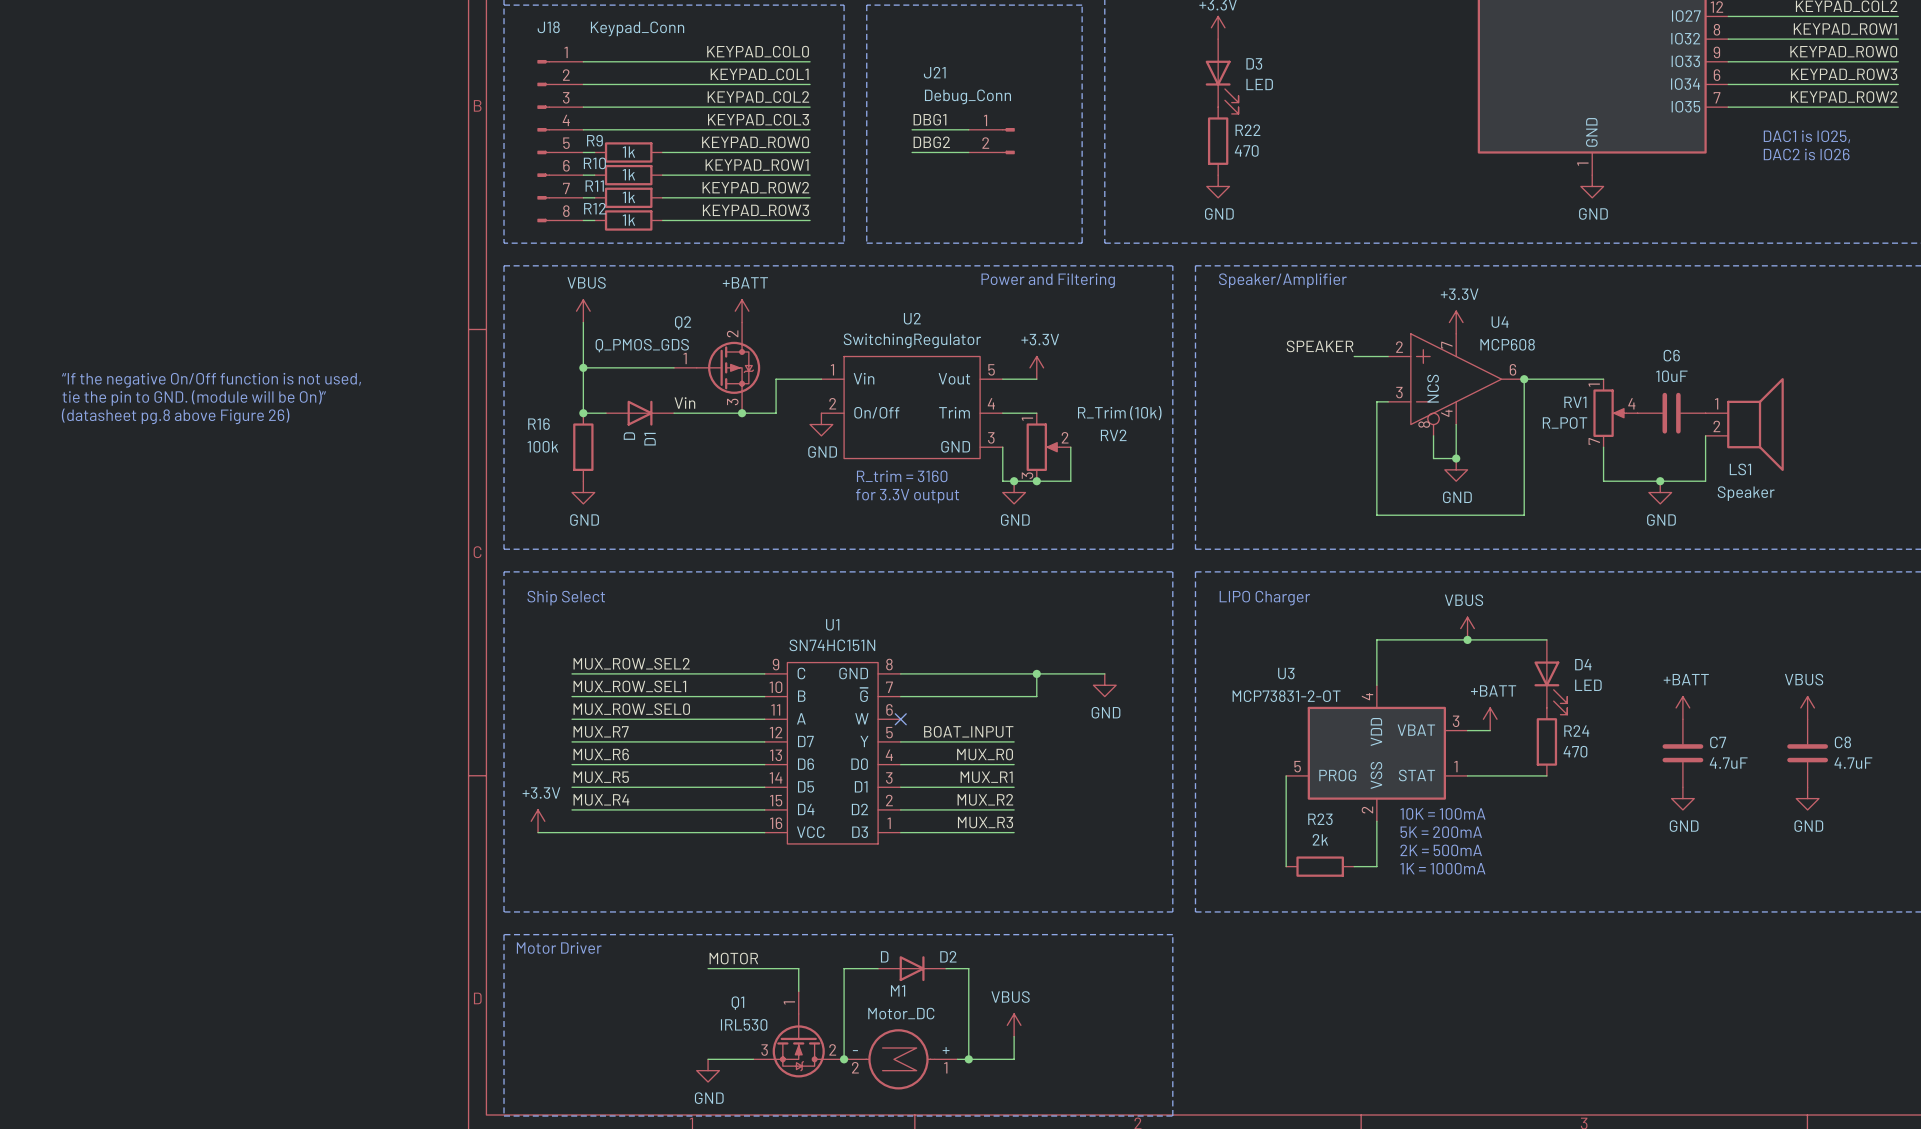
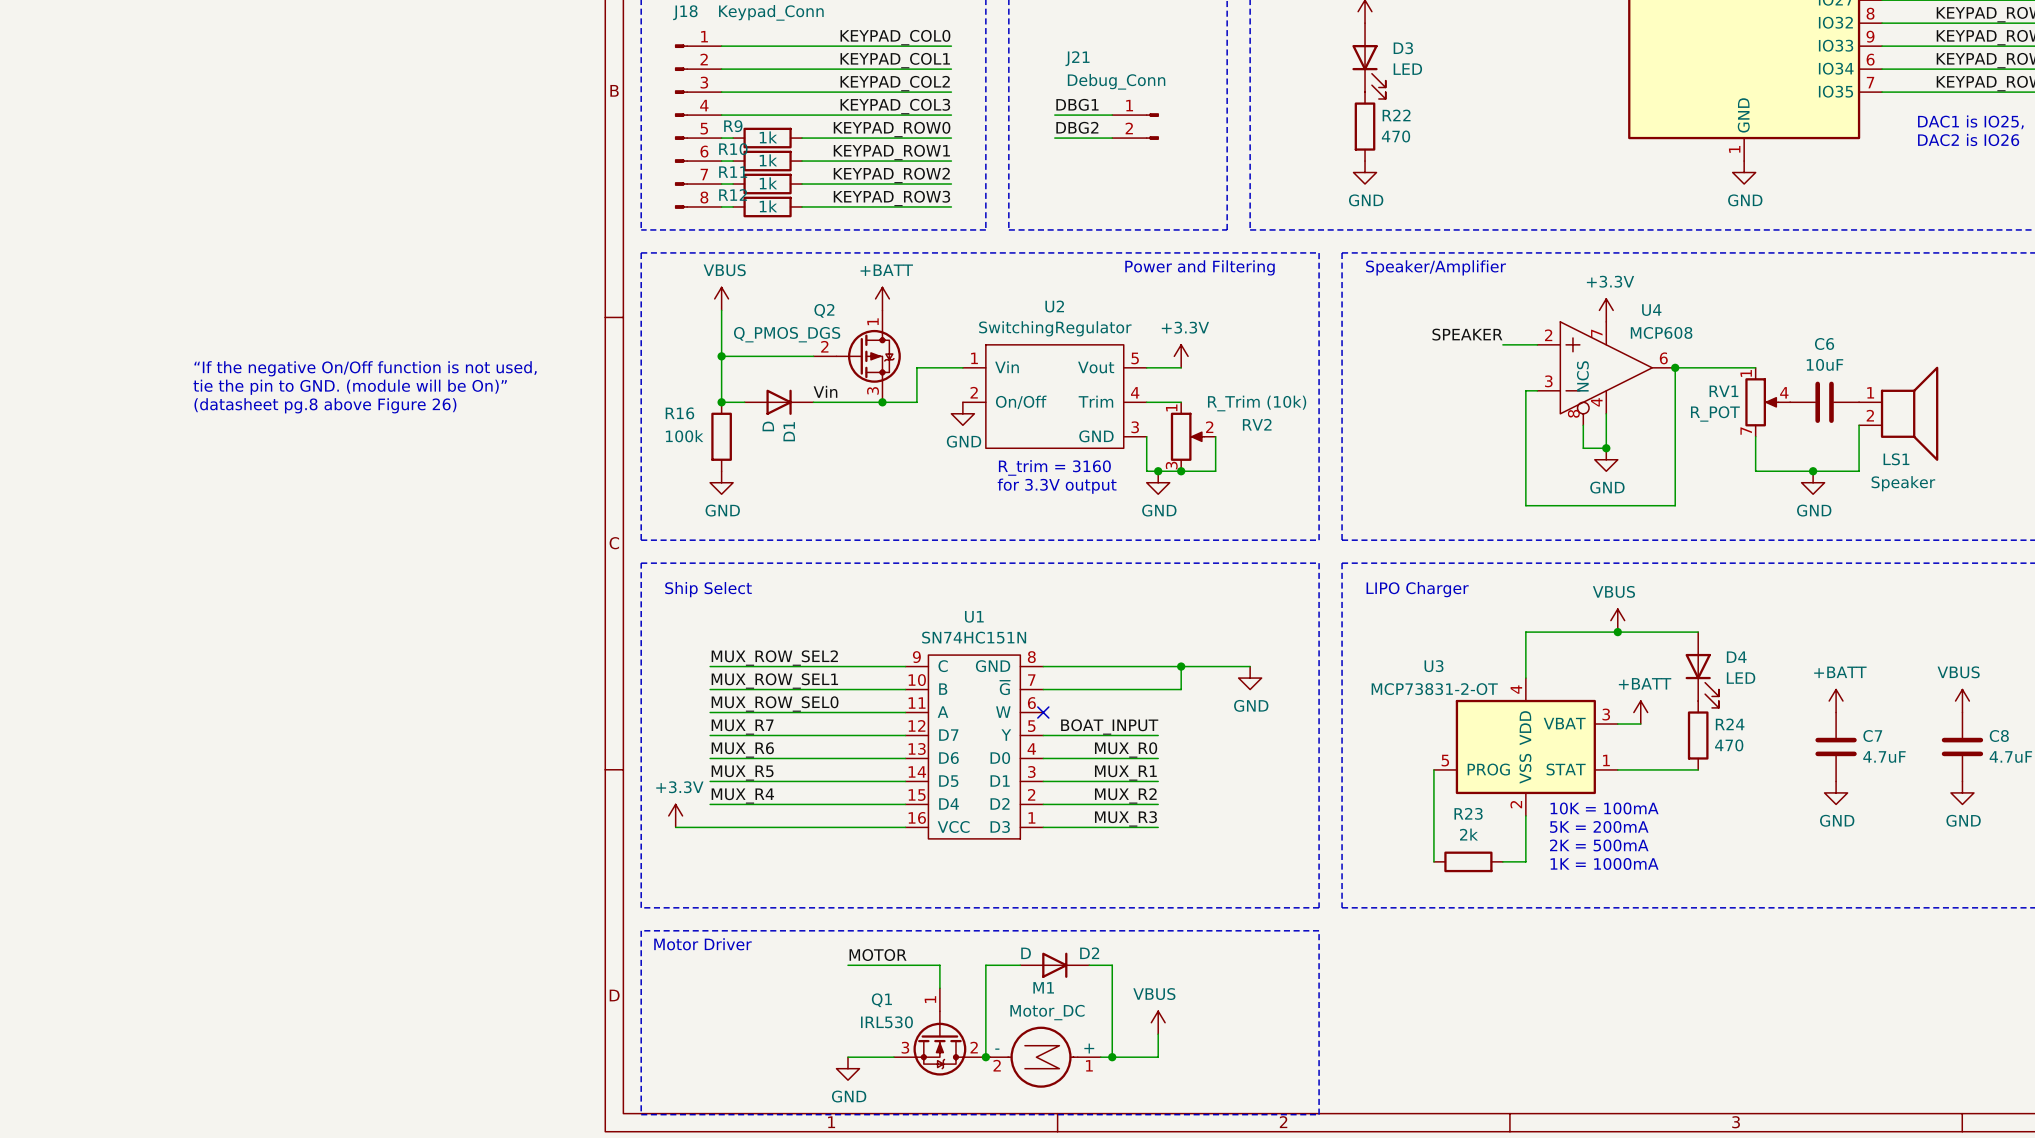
Q2 pin number: 2 (732, 333) -> 1 (872, 321)
Q2 value: Q_PMOS_GDS (642, 345) -> Q_PMOS_DGS (787, 334)
Q2 pin number: 1 (685, 358) -> 2 (824, 346)

